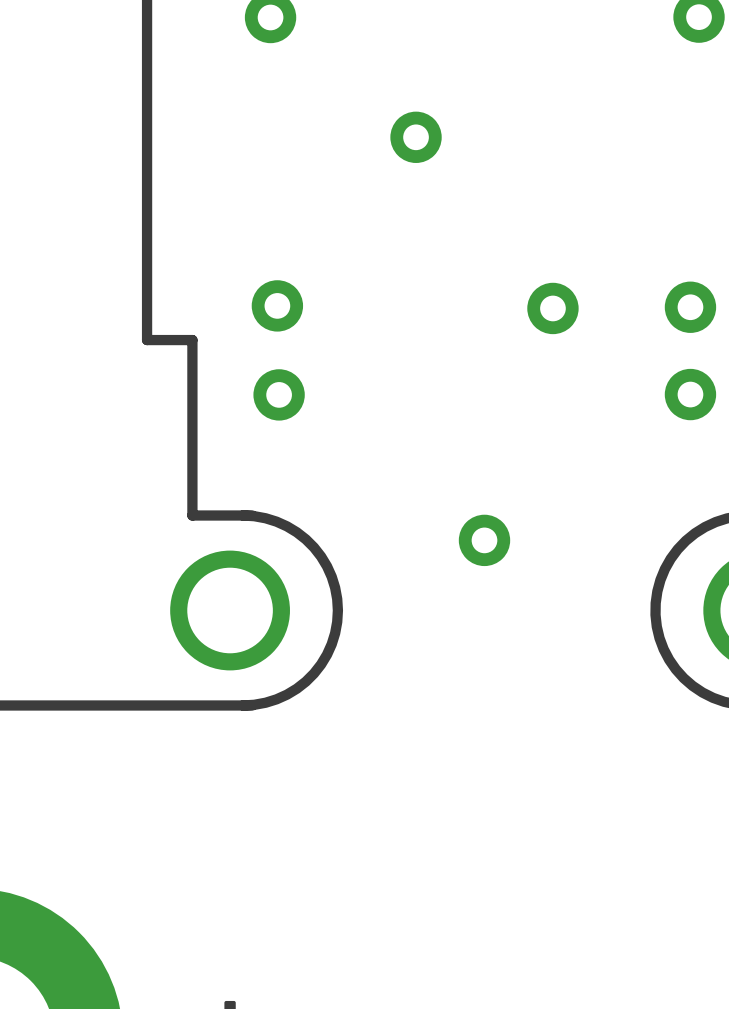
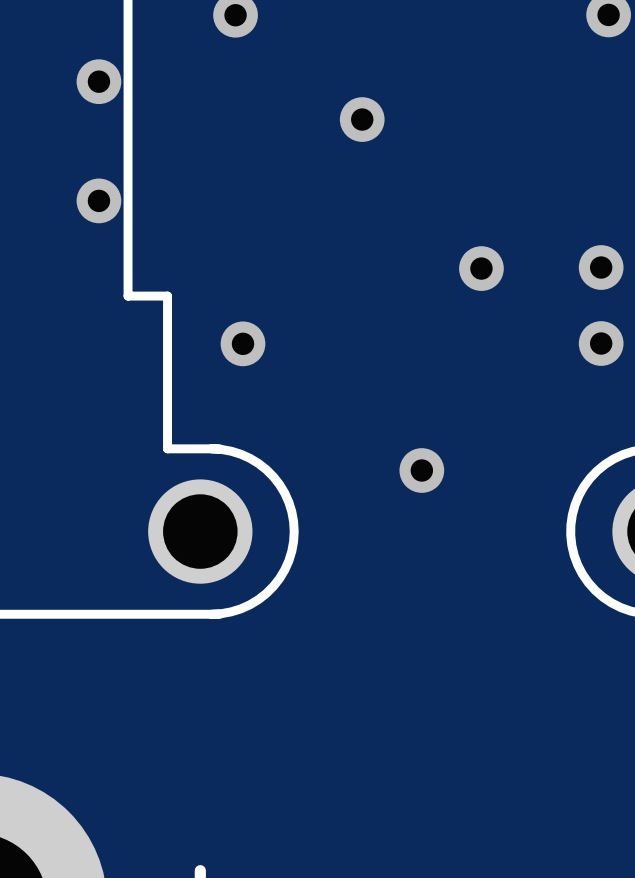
via: none -> (98, 81)
via: none -> (98, 200)
via: (277, 305) -> none

